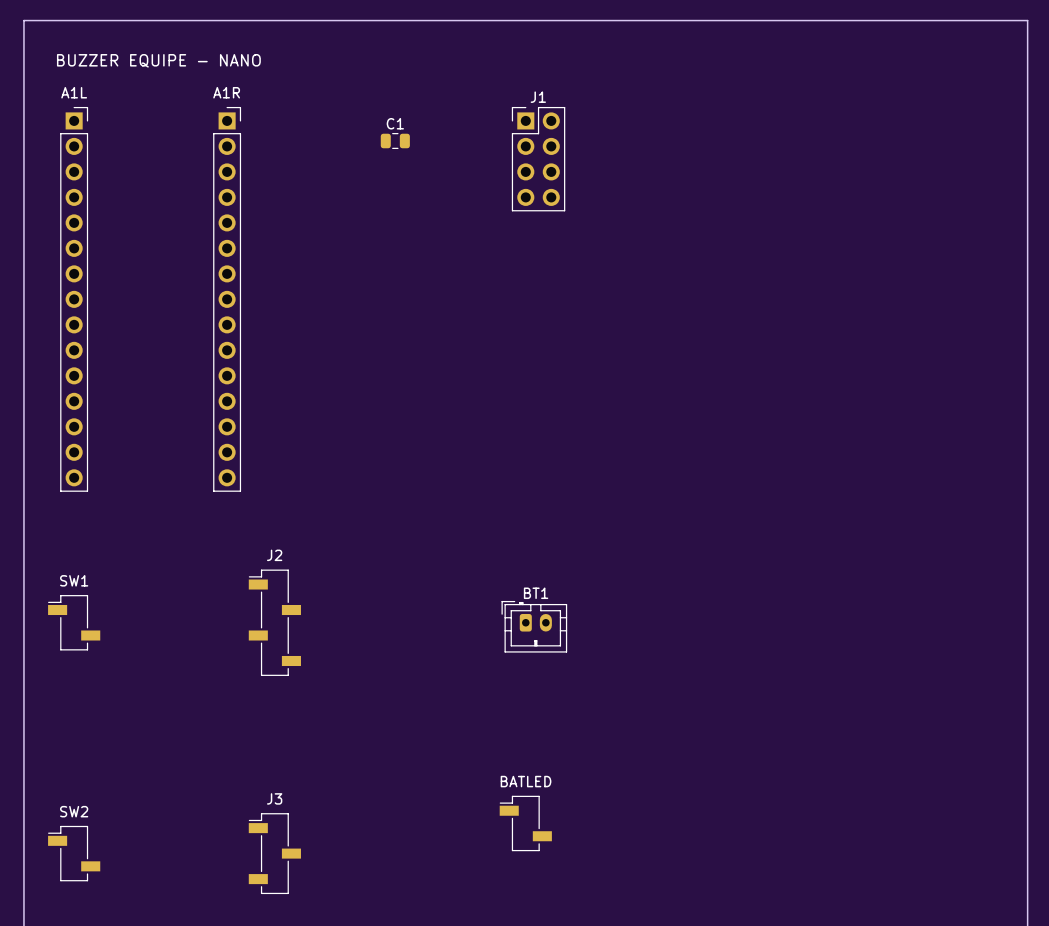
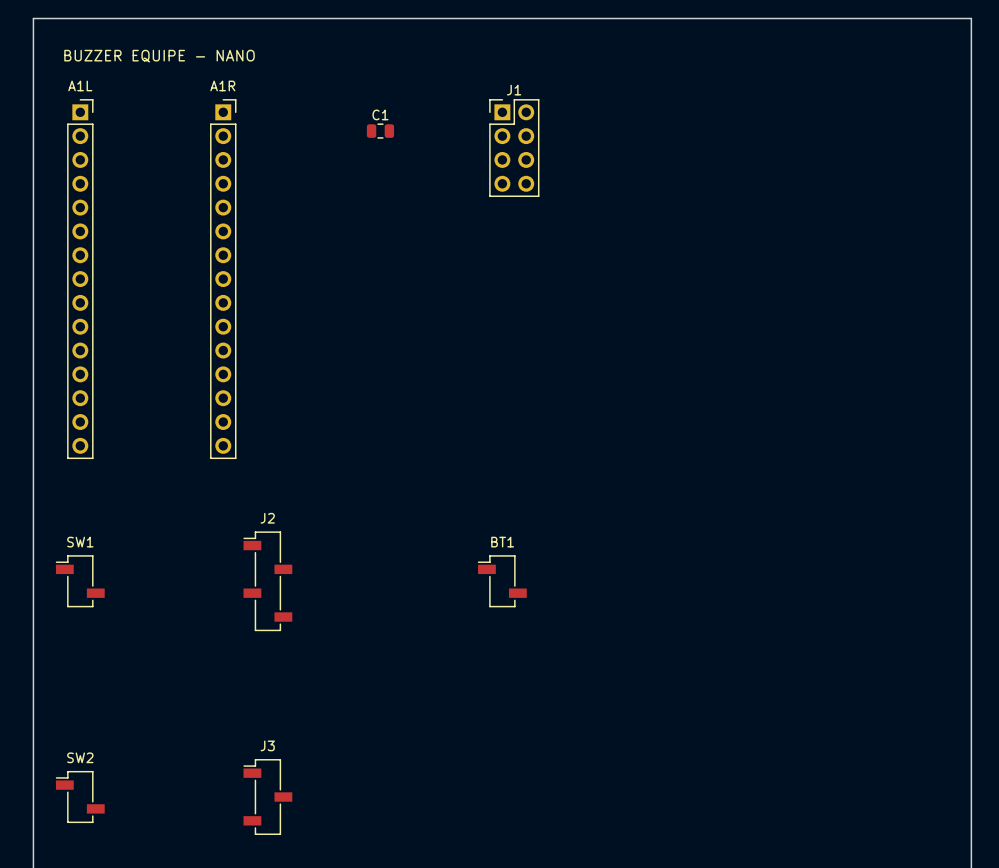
BT1 footprint: [501, 600, 568, 653] -> [478, 555, 527, 608]
BATLED: (525, 823) -> none

